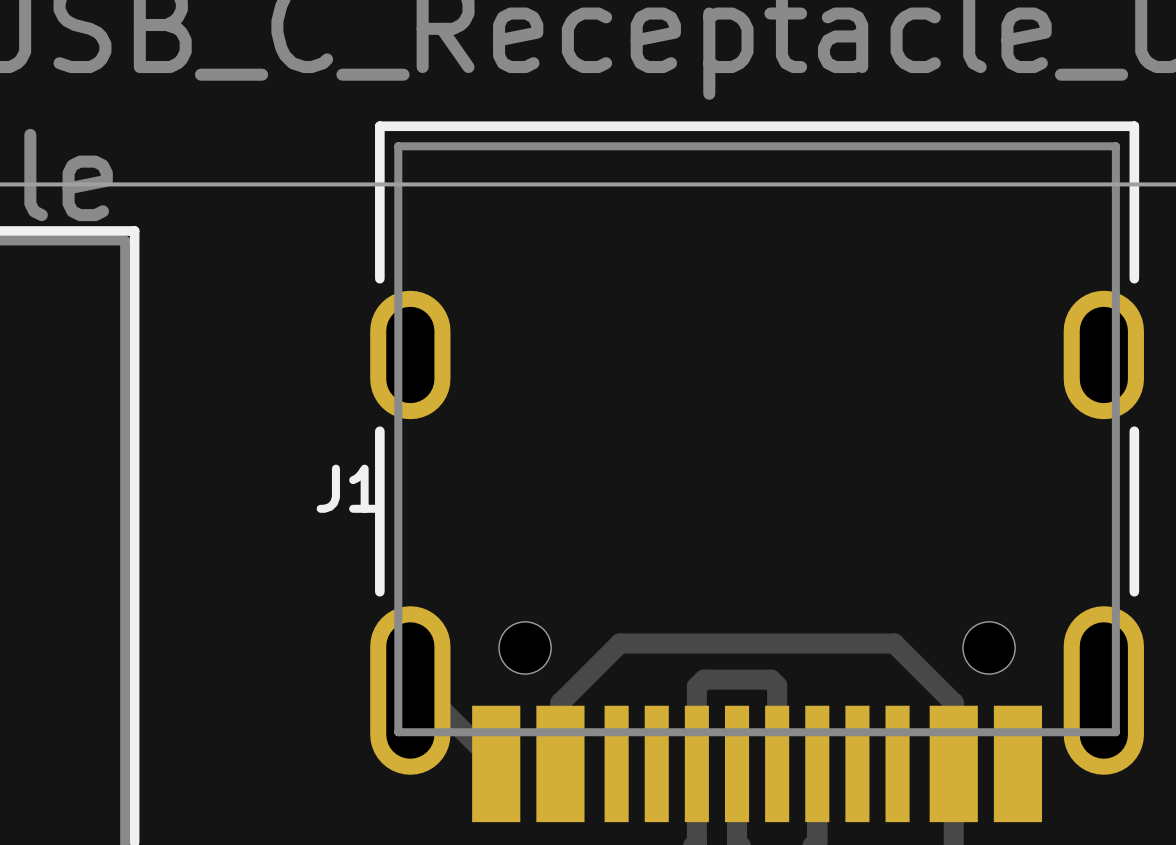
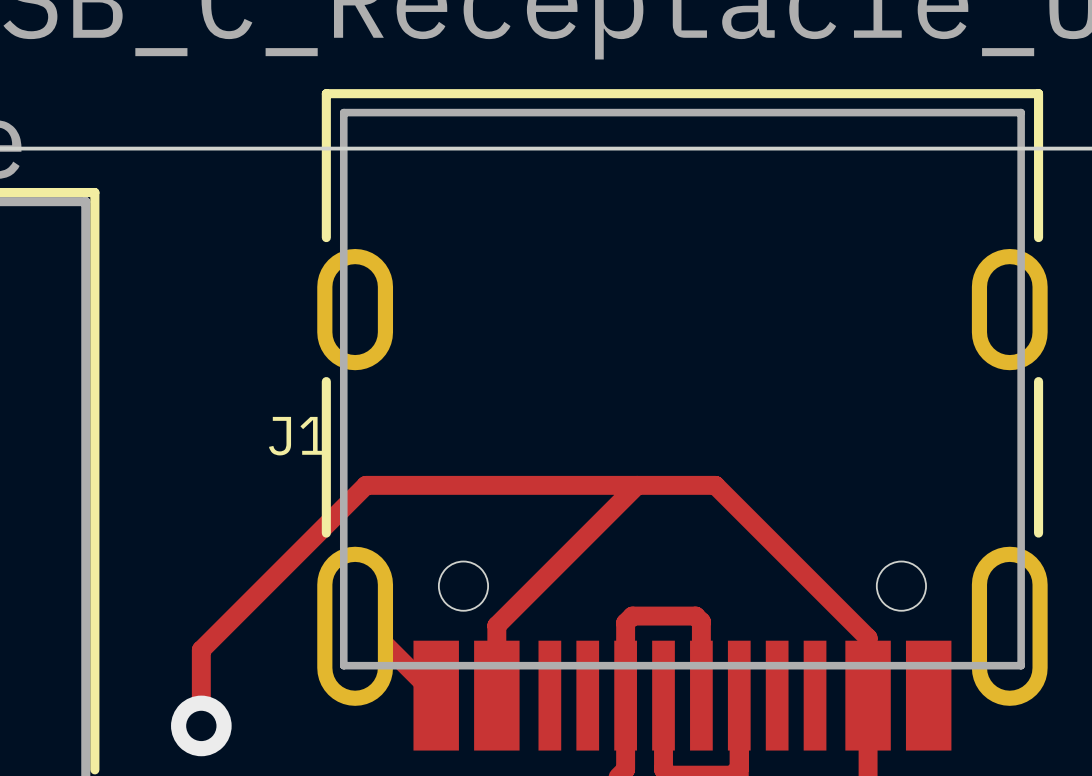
track: (894, 643) (619, 643) (560, 702) -> (637, 485) (496, 625) (496, 638)
track: none -> (812, 581) (715, 485) (365, 485) (201, 650) (201, 725)
via: none -> (201, 725)

